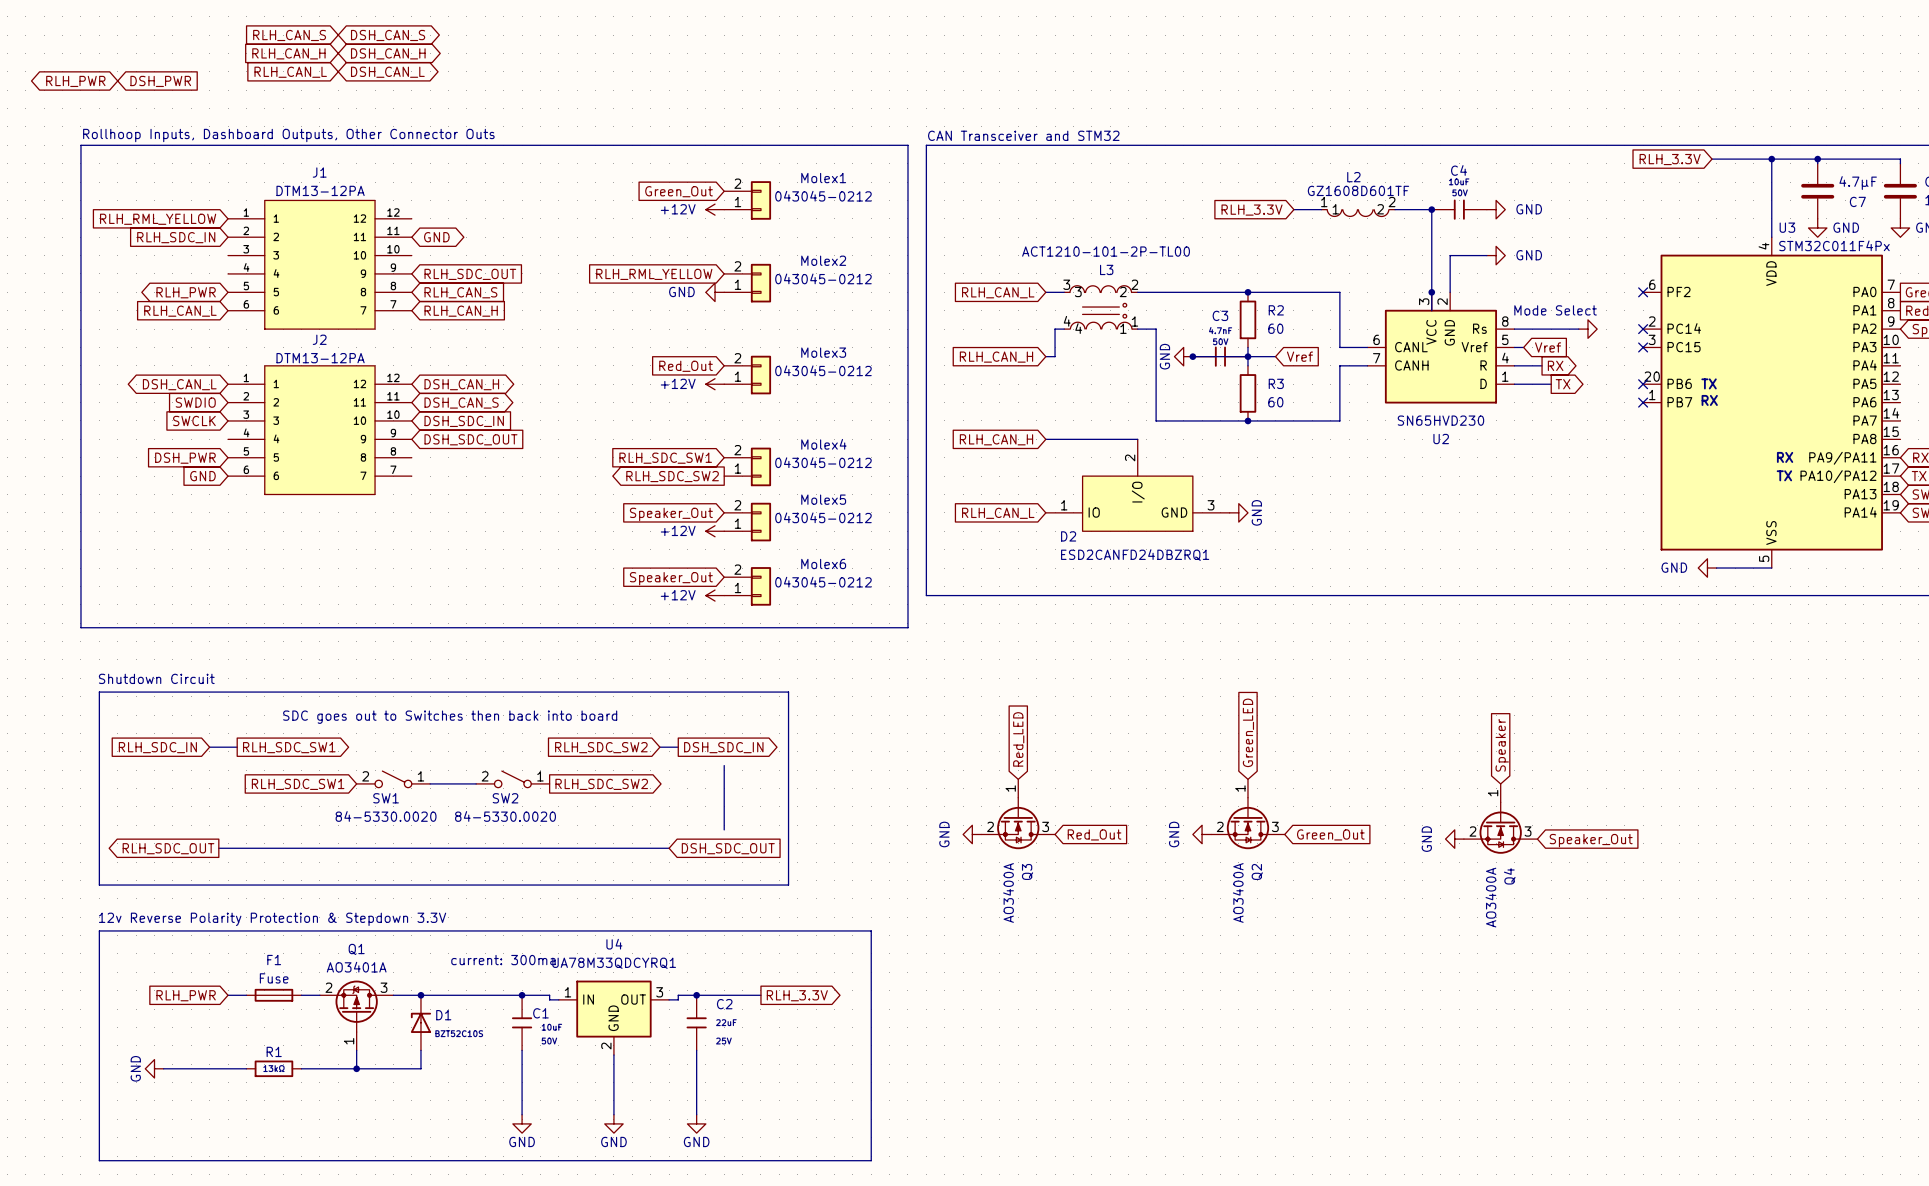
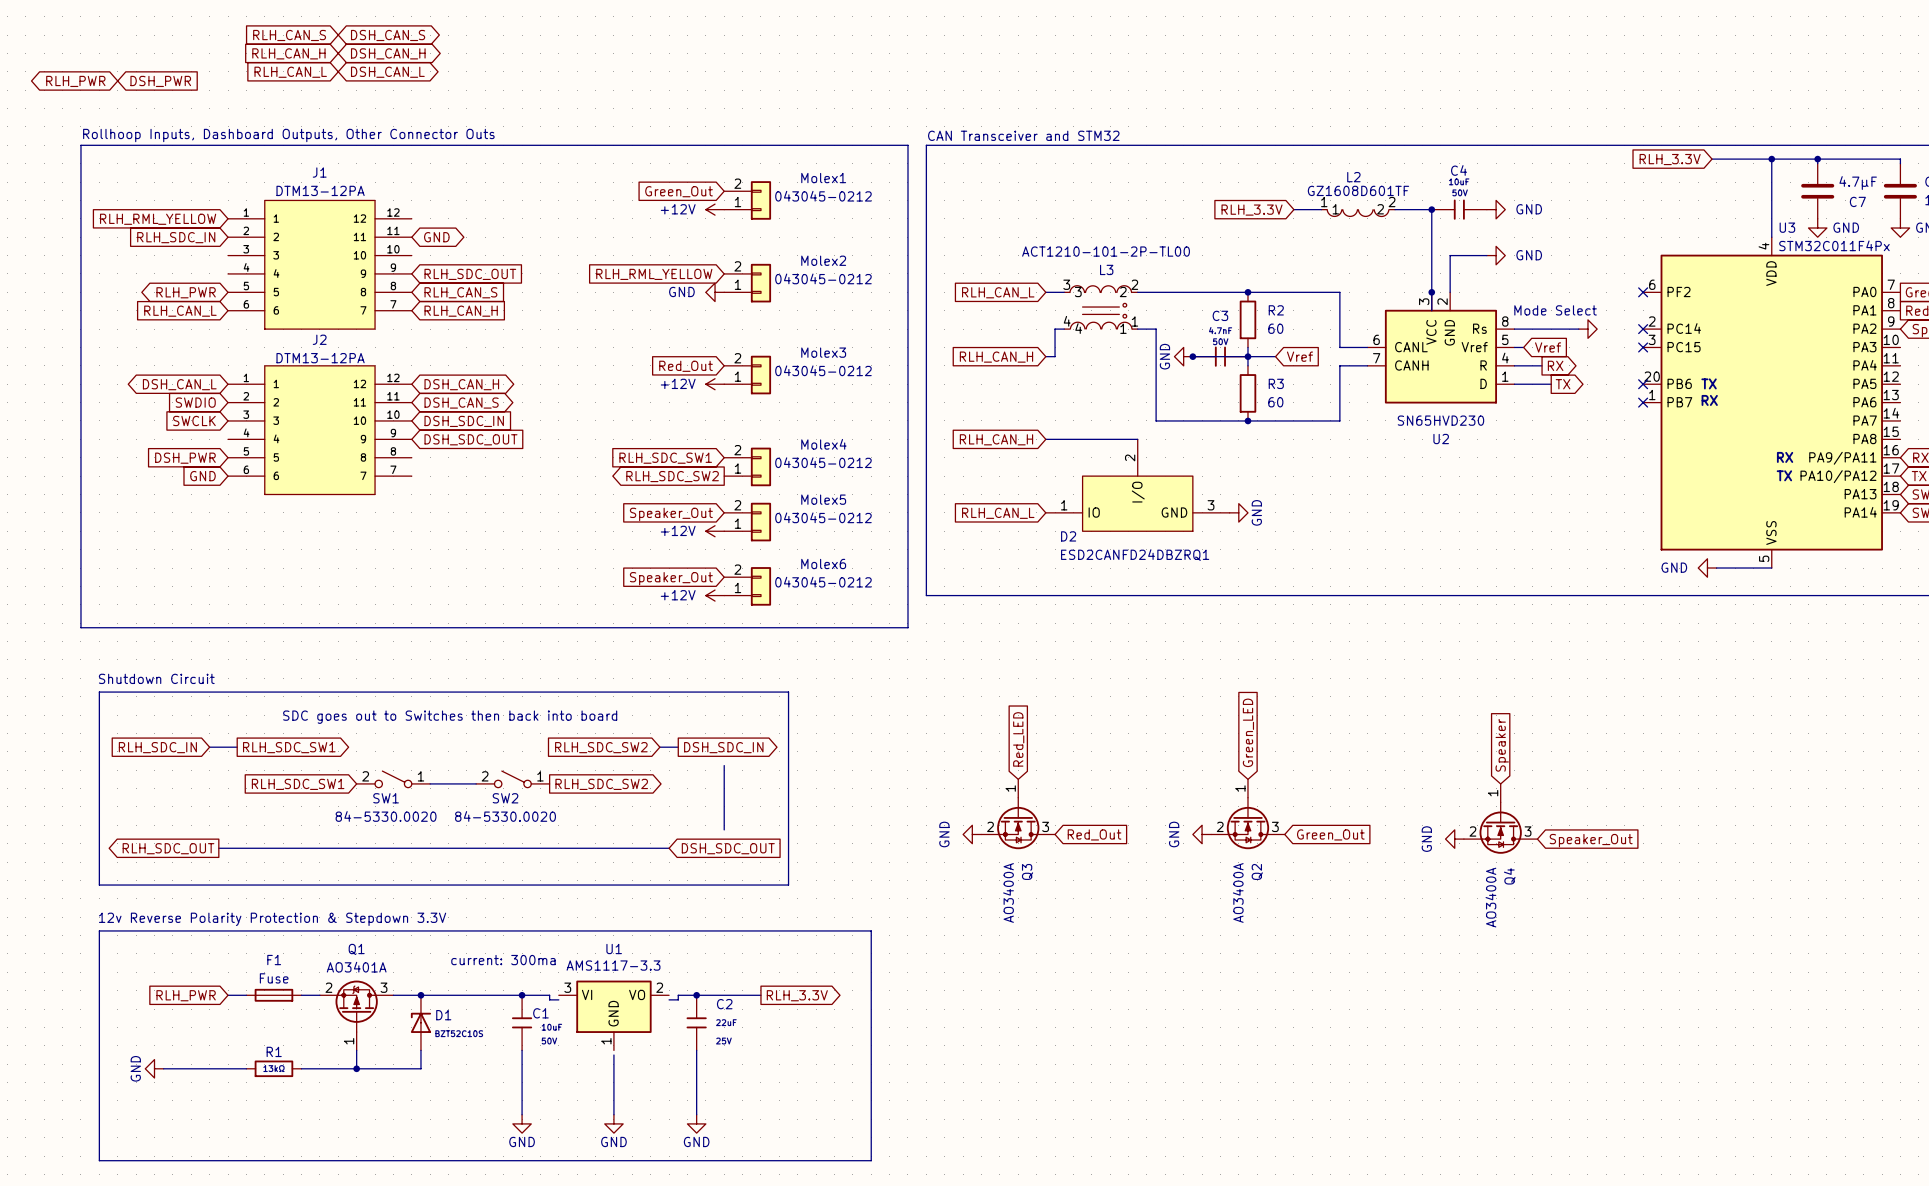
U1: none -> AMS1117-3.3 (613, 1015)
U4: UA78M33QDCYRQ1 (613, 1017) -> none

